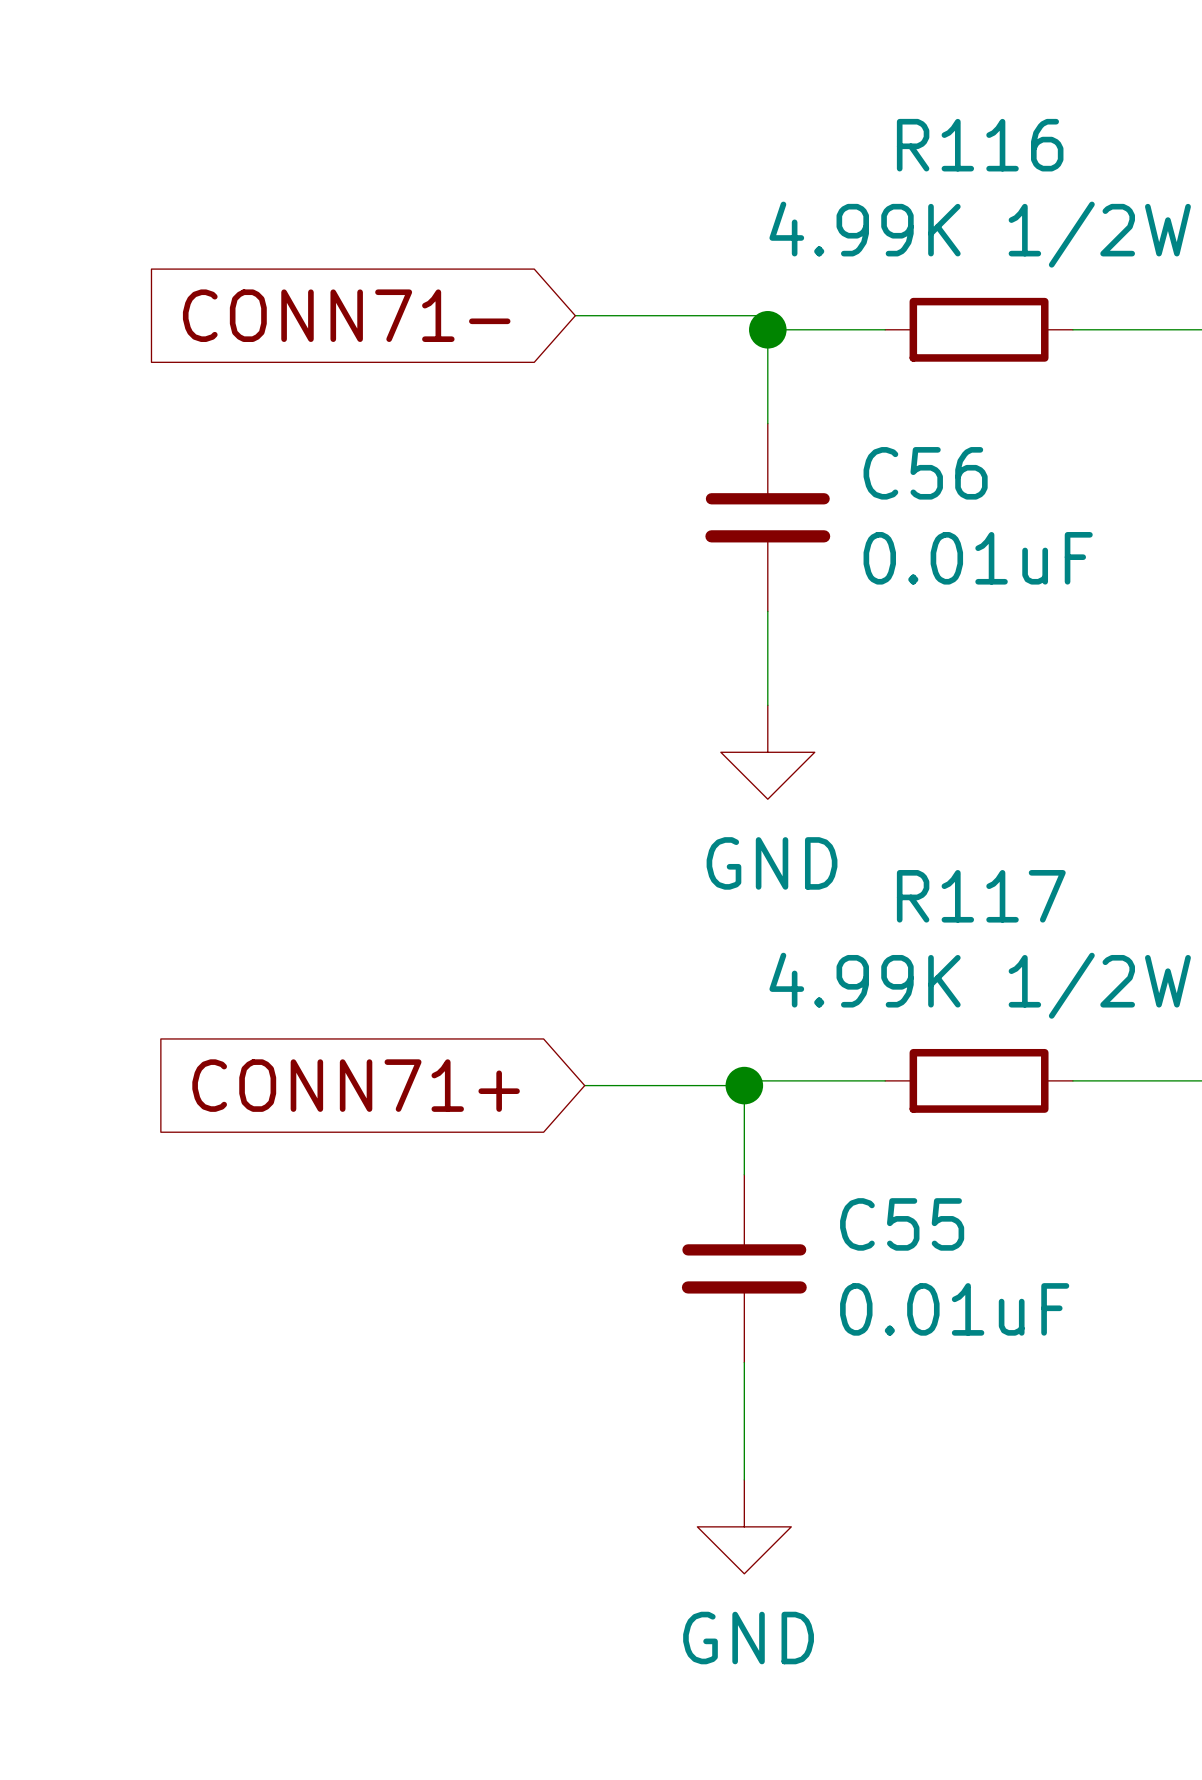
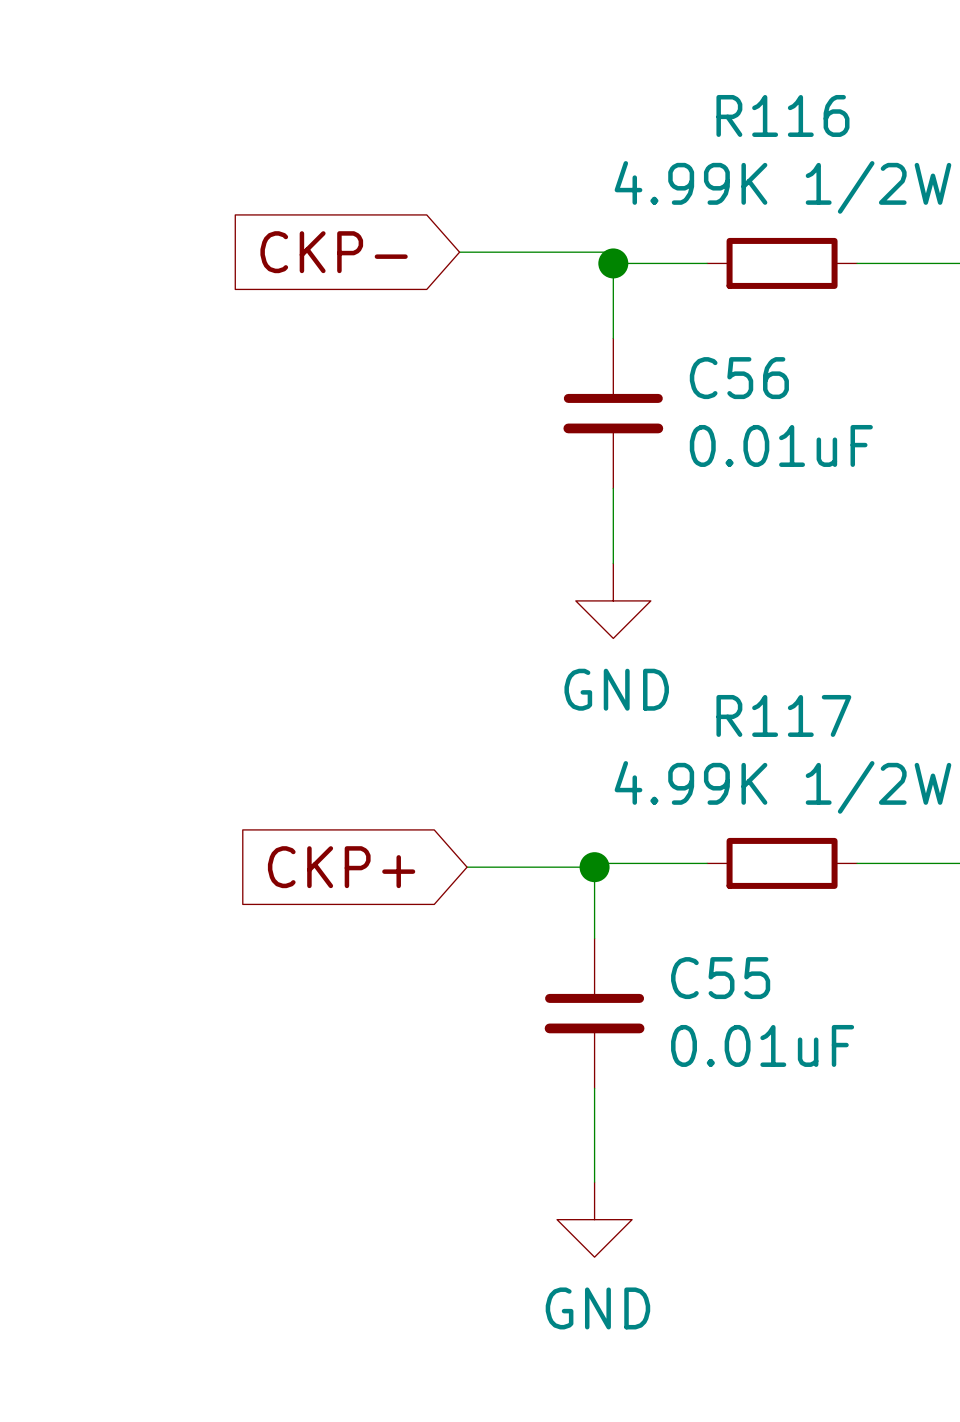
global label: CONN71- (346, 315) -> CKP- (334, 252)
global label: CONN71+ (356, 1085) -> CKP+ (341, 867)

